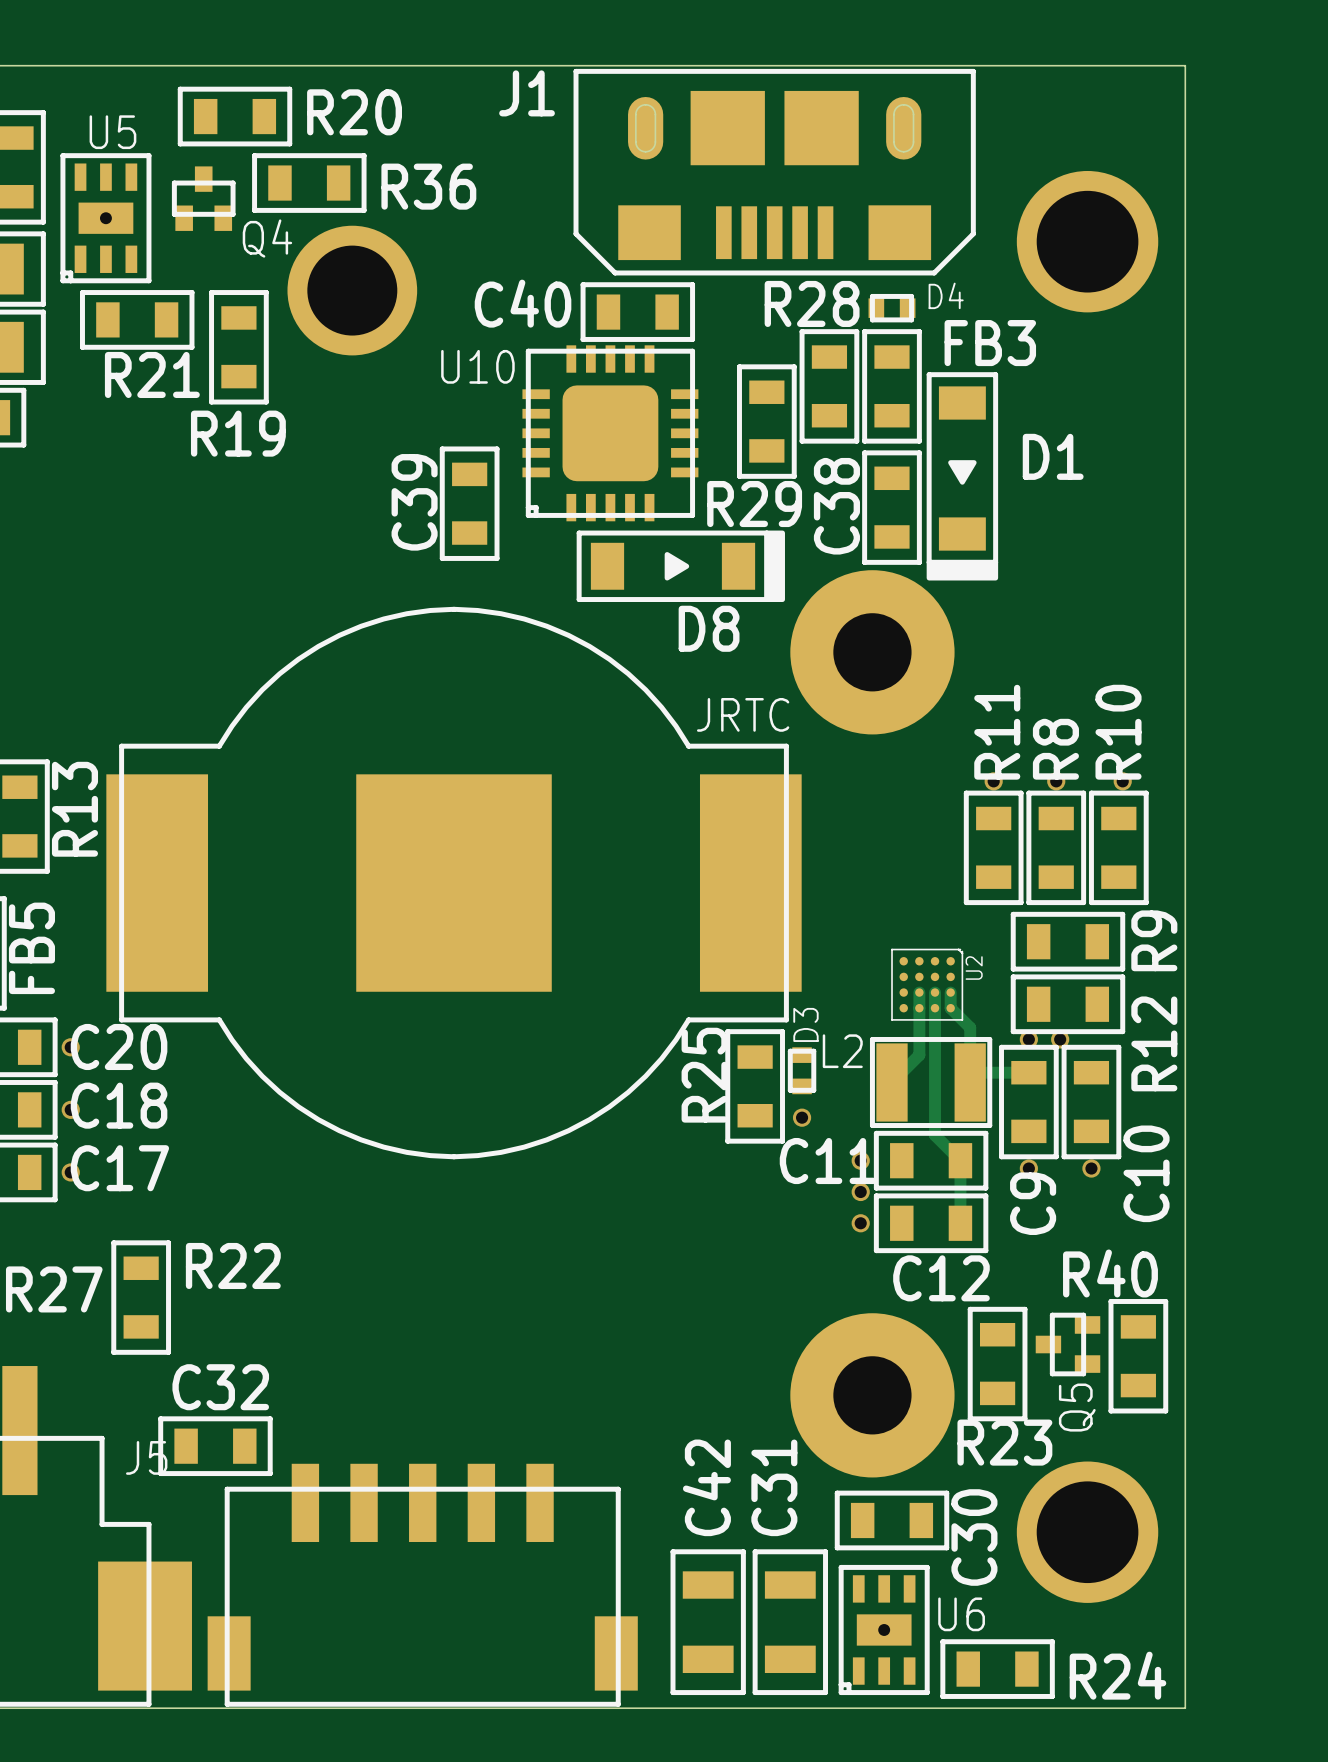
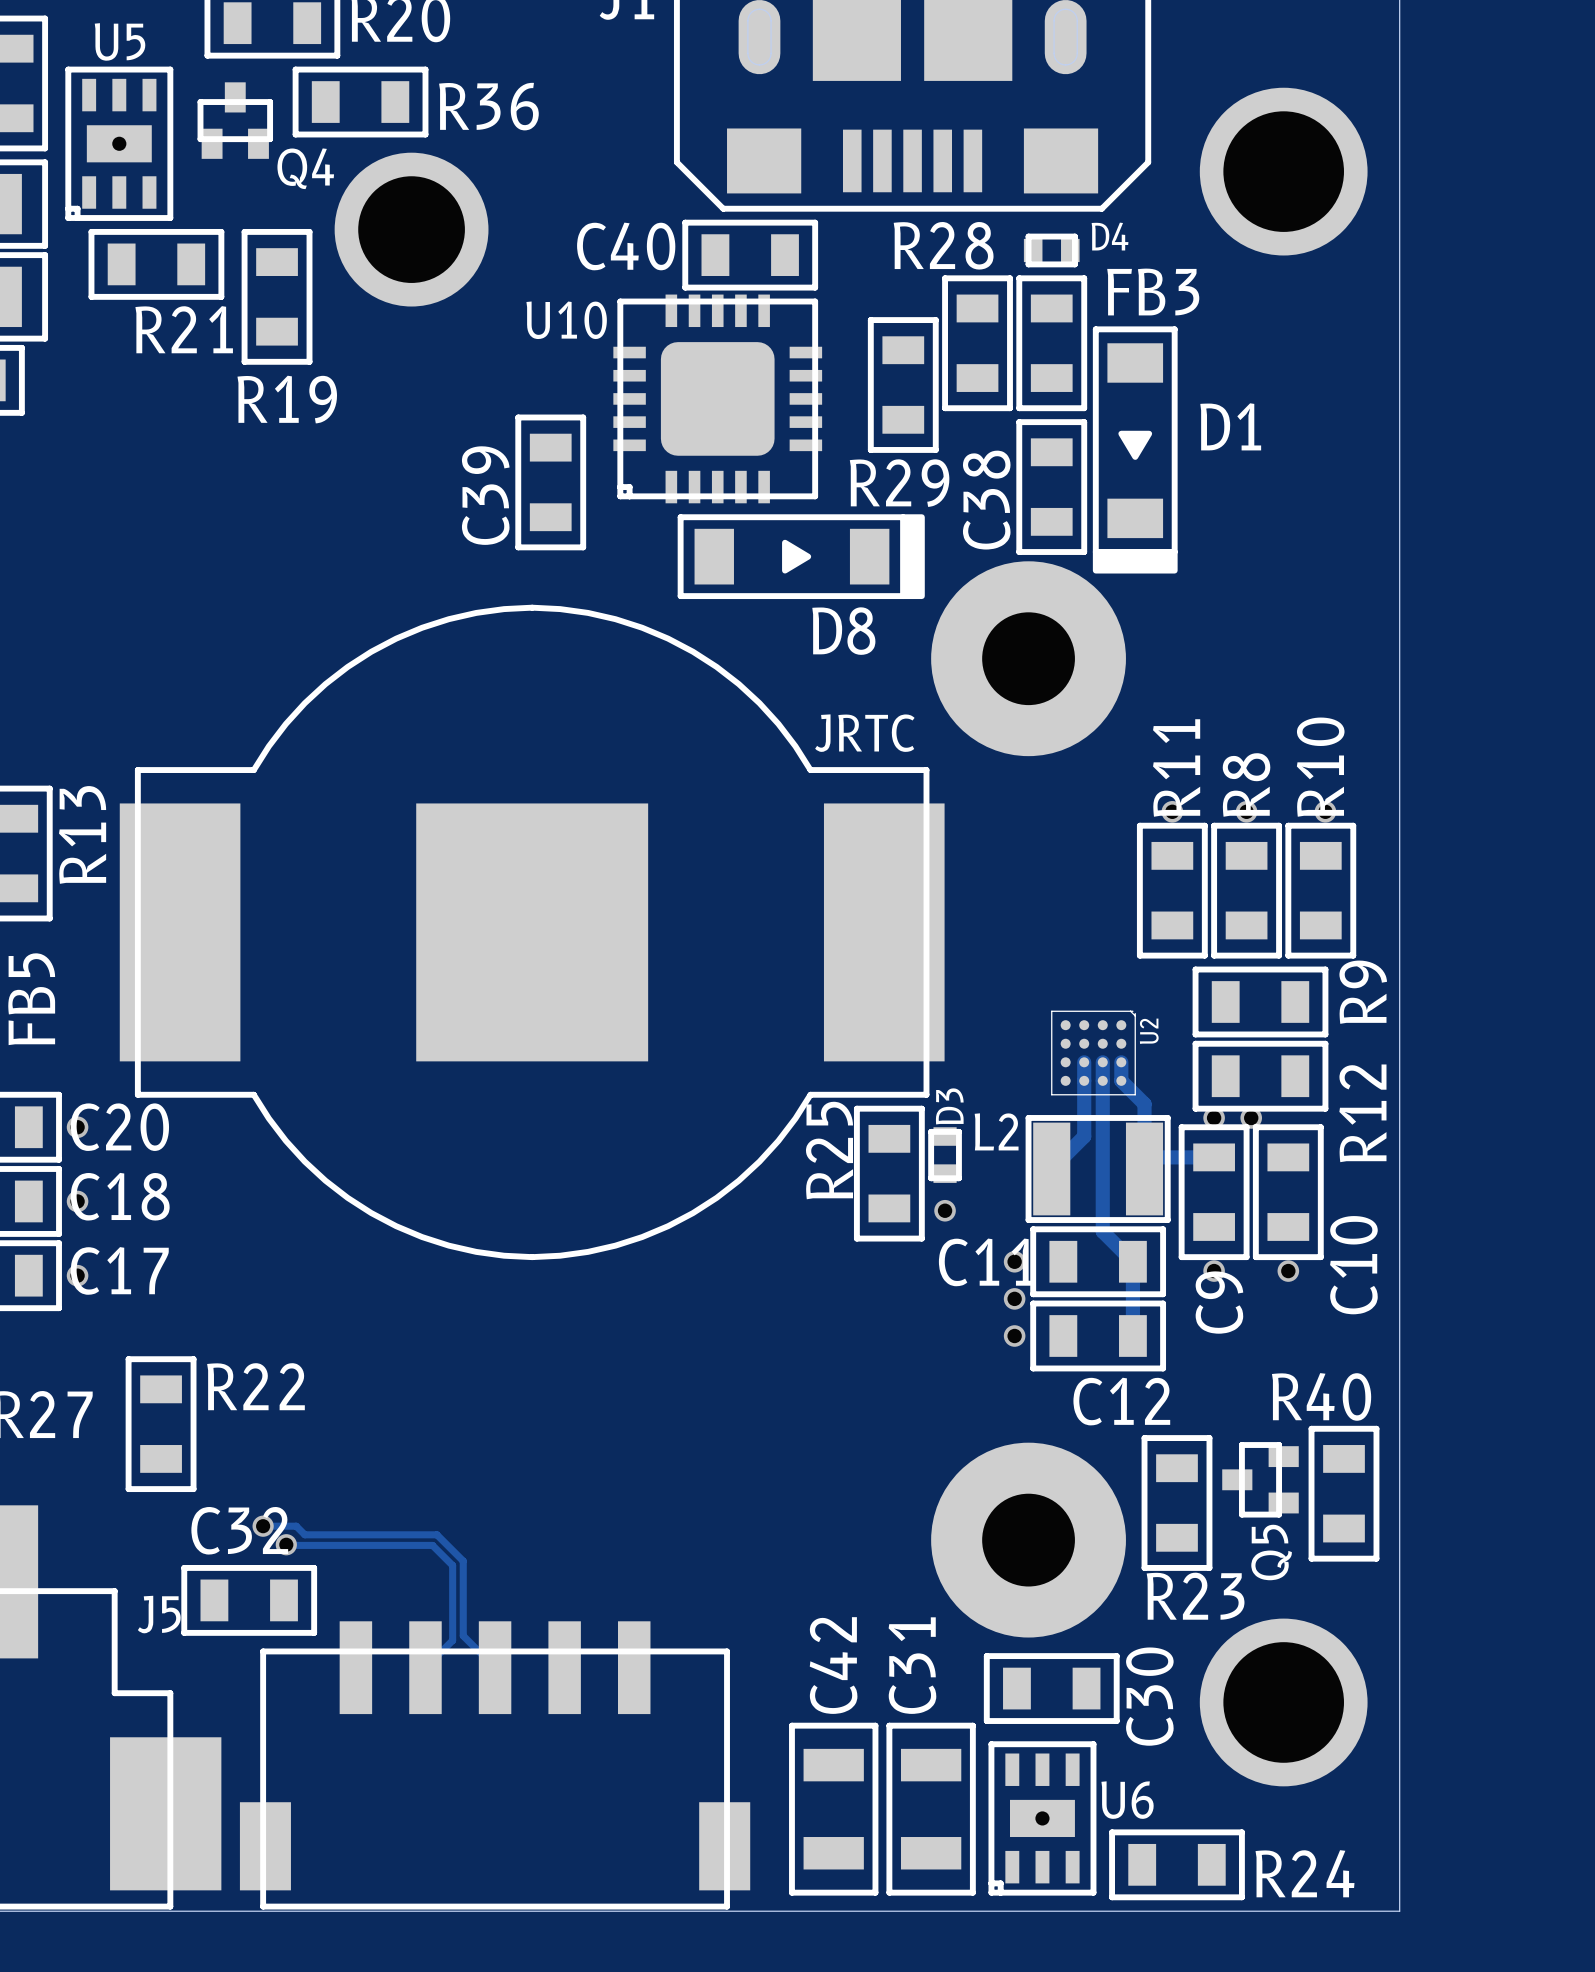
track: none -> (263, 1526) (296, 1526) (304, 1534) (436, 1534) (463, 1561) (463, 1635) (495, 1667)
via: none -> (263, 1526)
track: none -> (286, 1544) (432, 1545) (452, 1565) (452, 1640) (425, 1667)
via: none -> (286, 1544)

